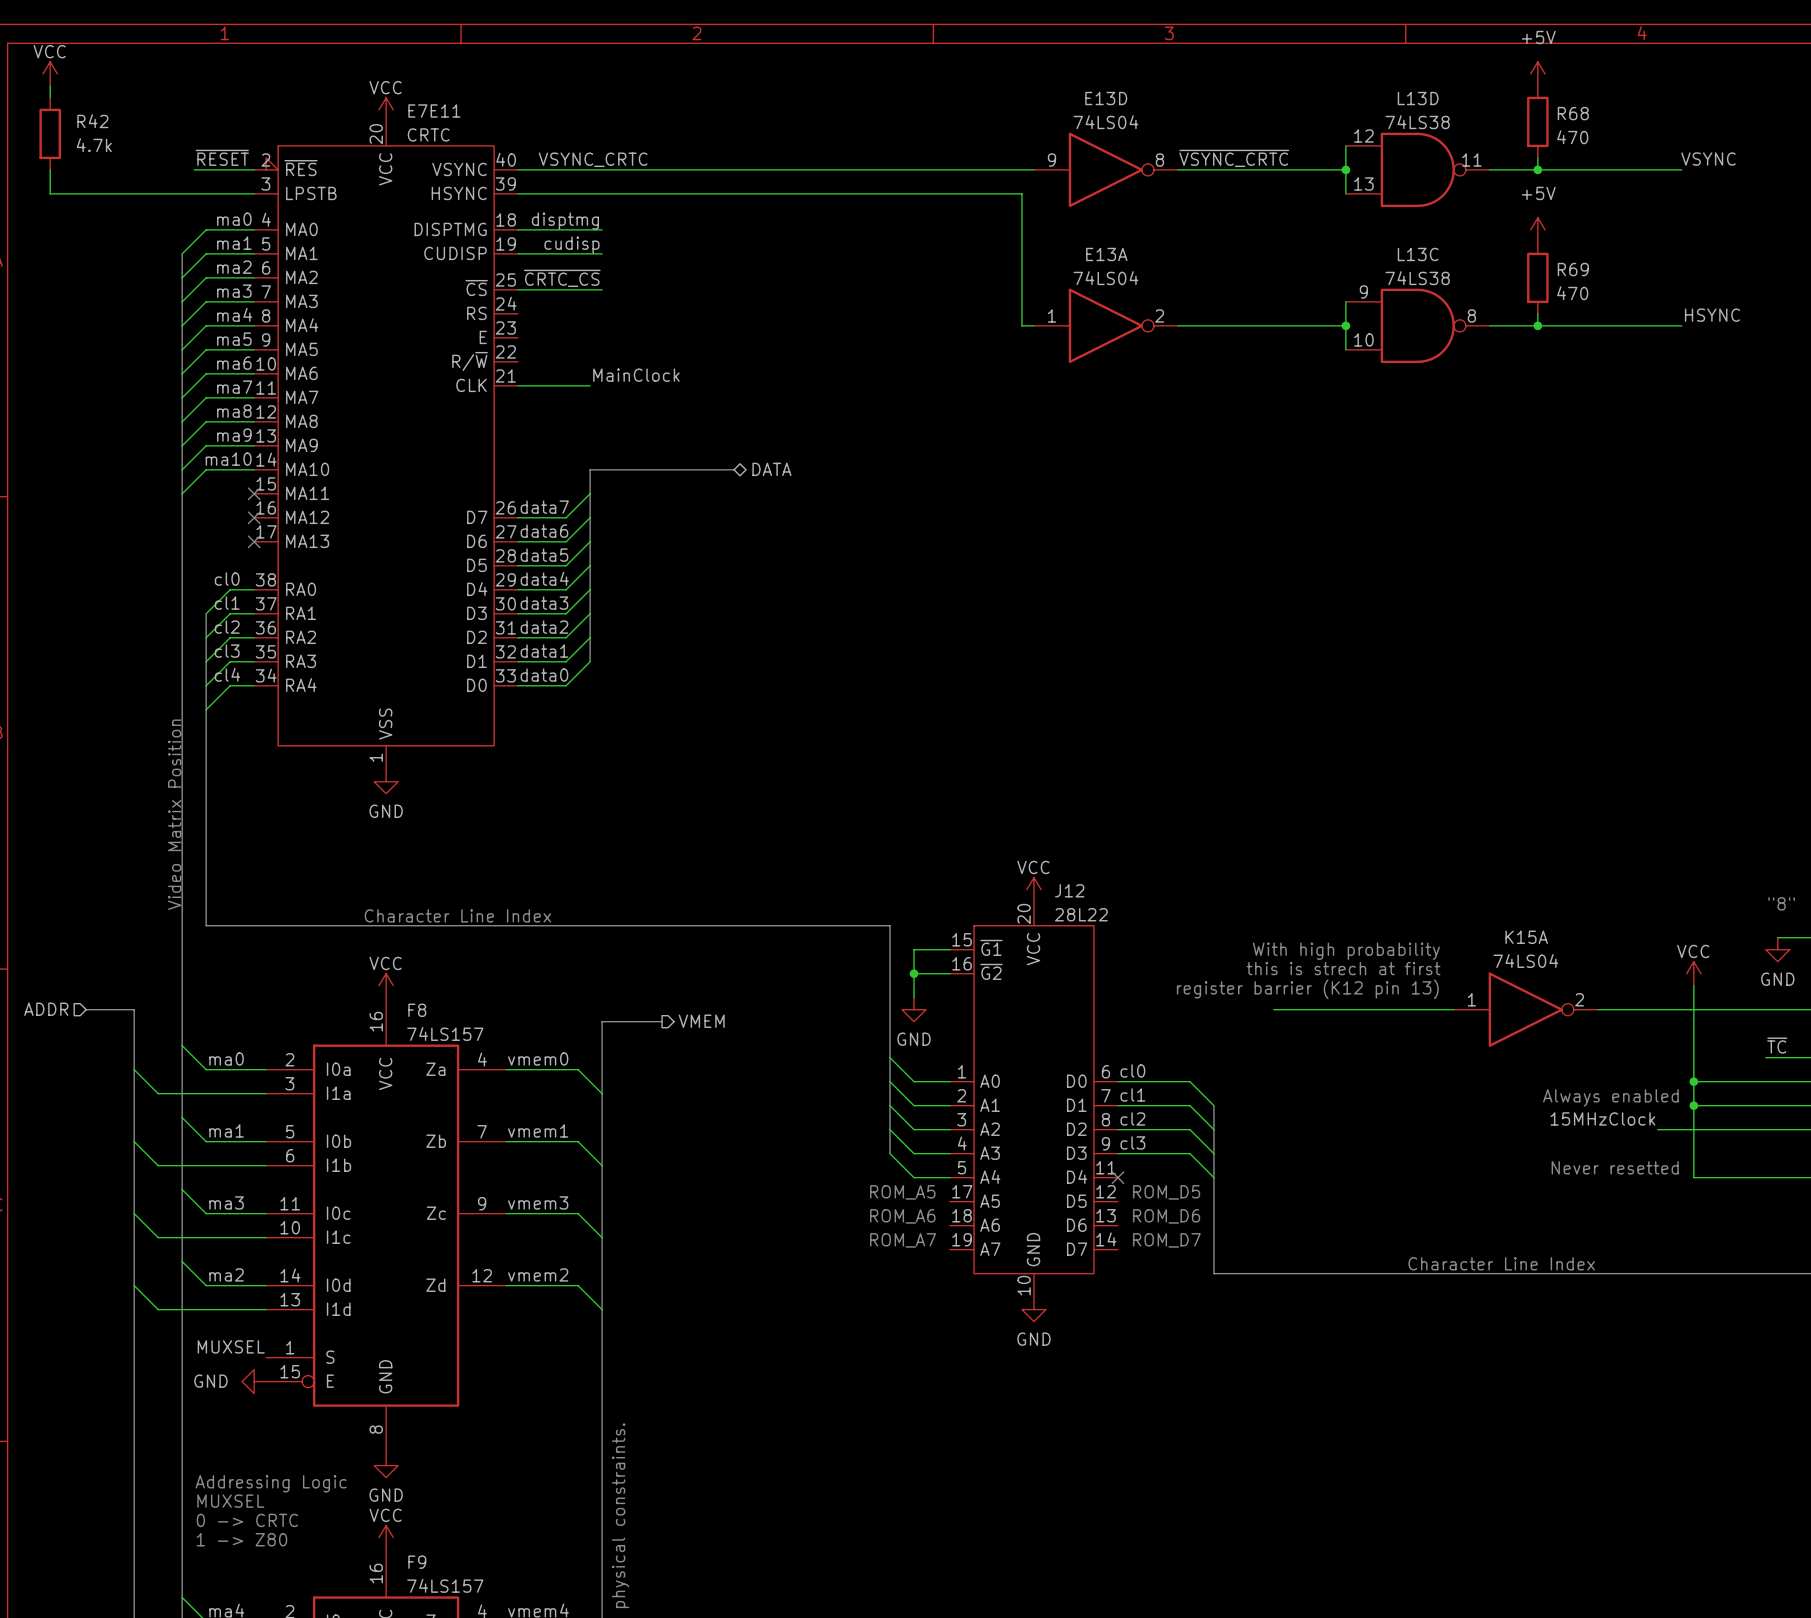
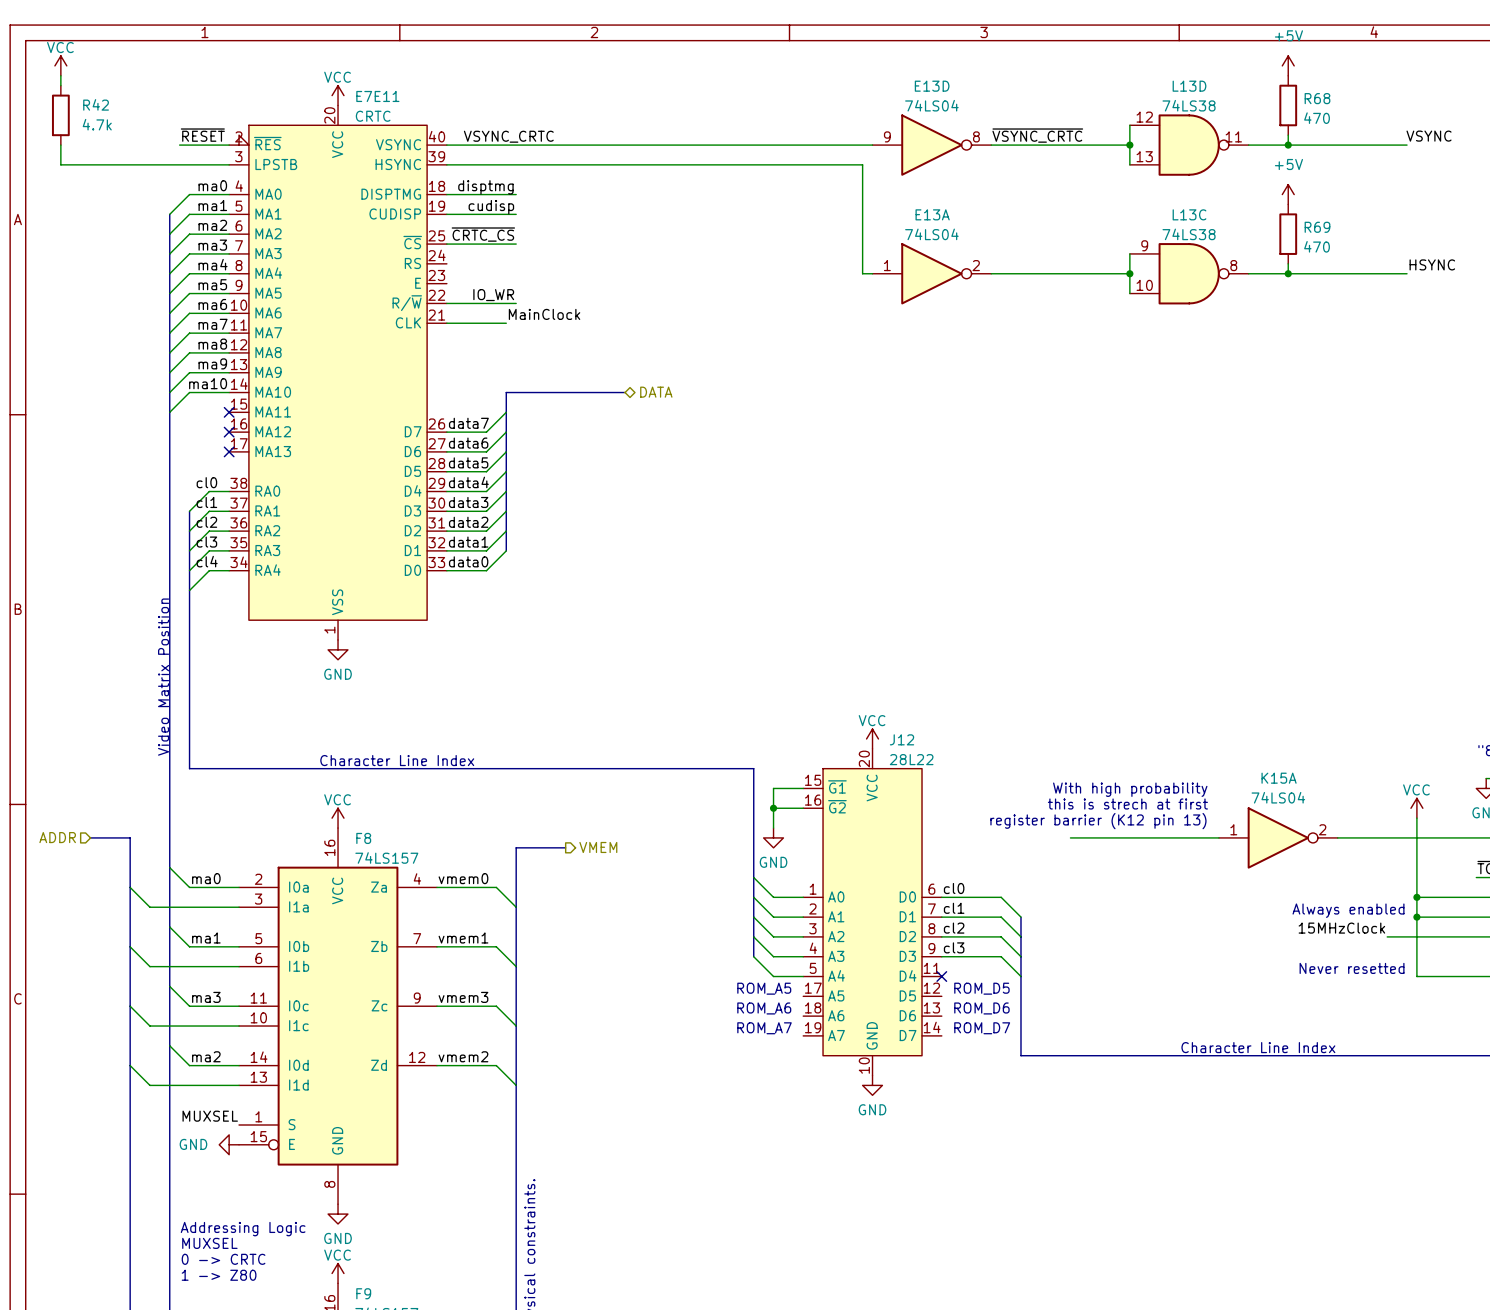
label: none -> IO_WR (493, 295)
wire: none -> (446, 303) (516, 303)

